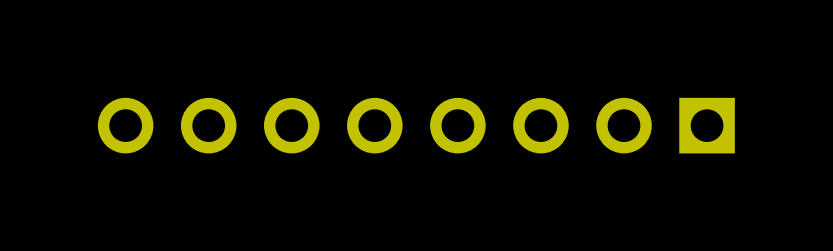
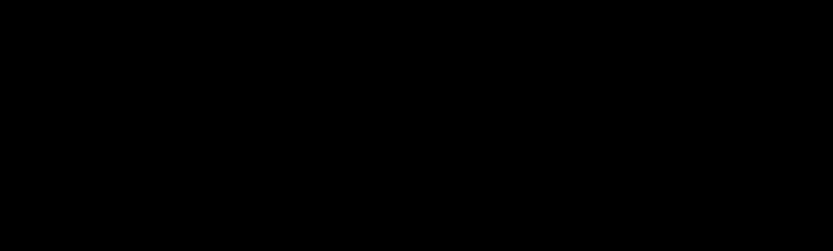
part: (416, 125) -> none

